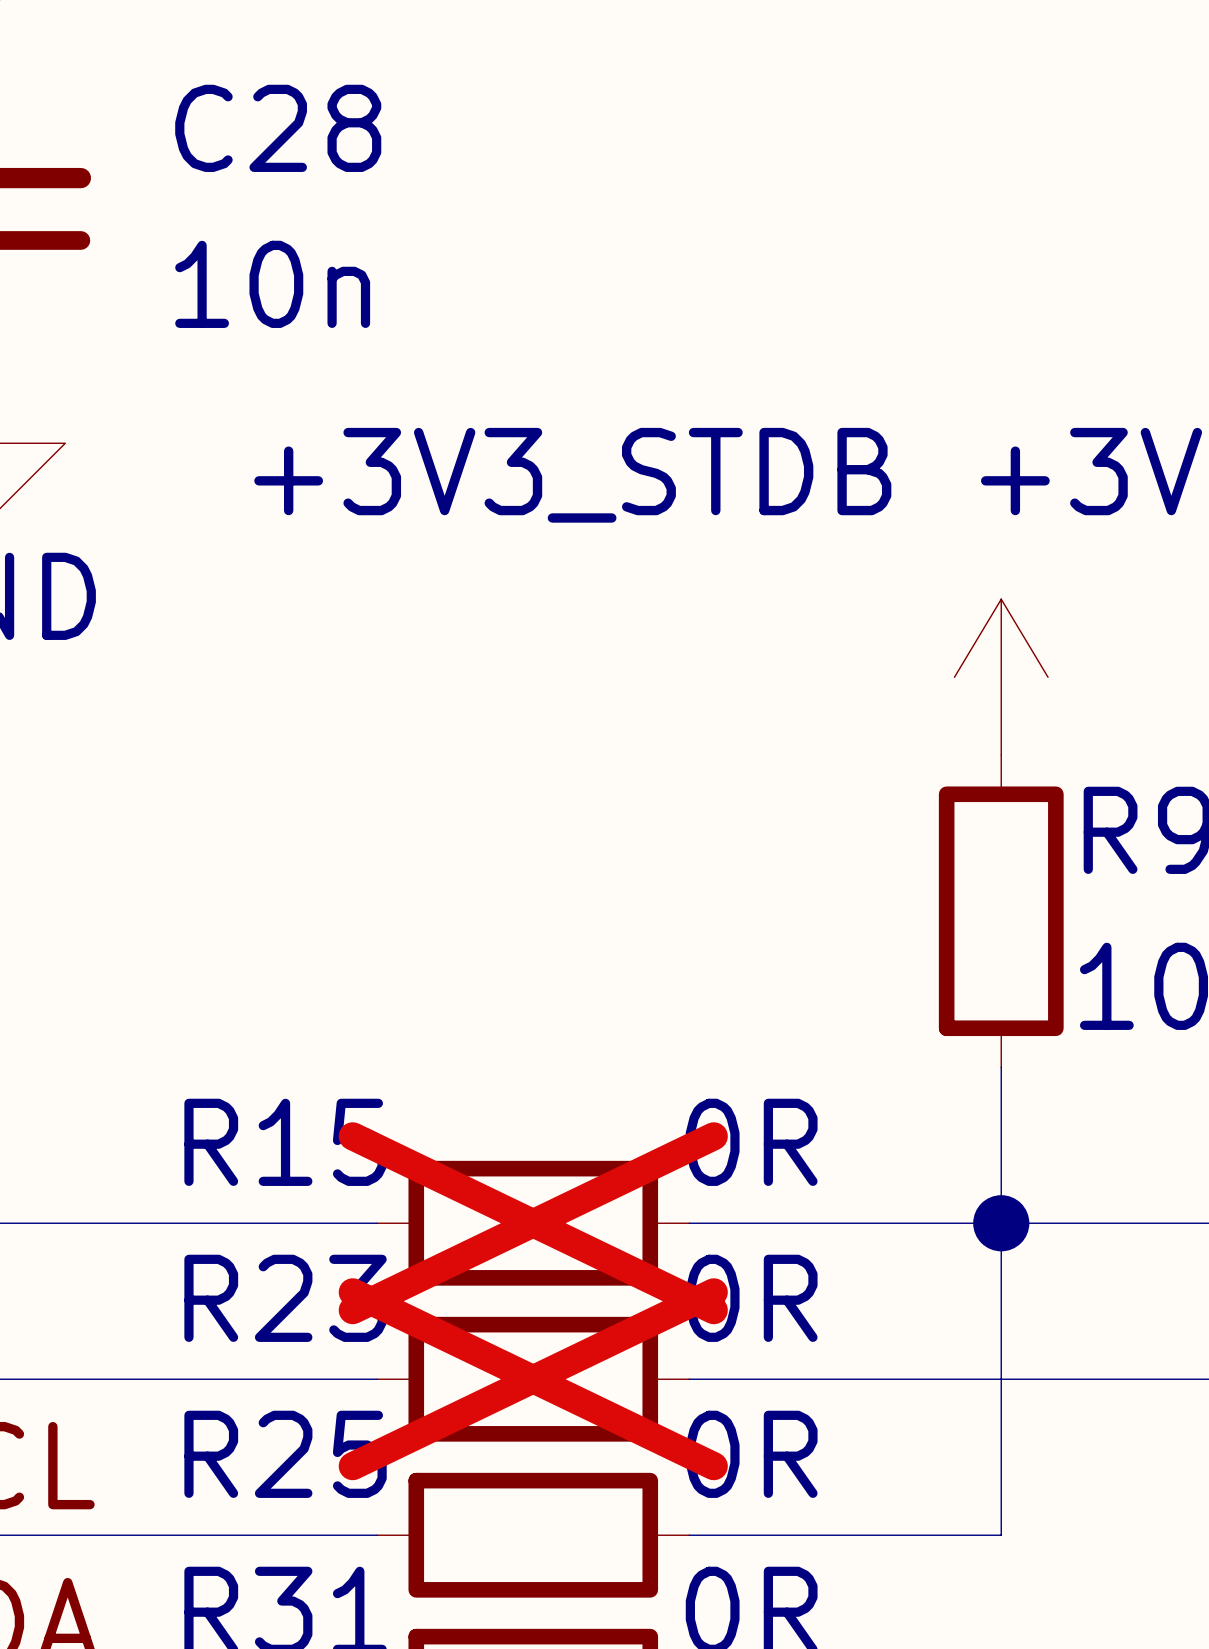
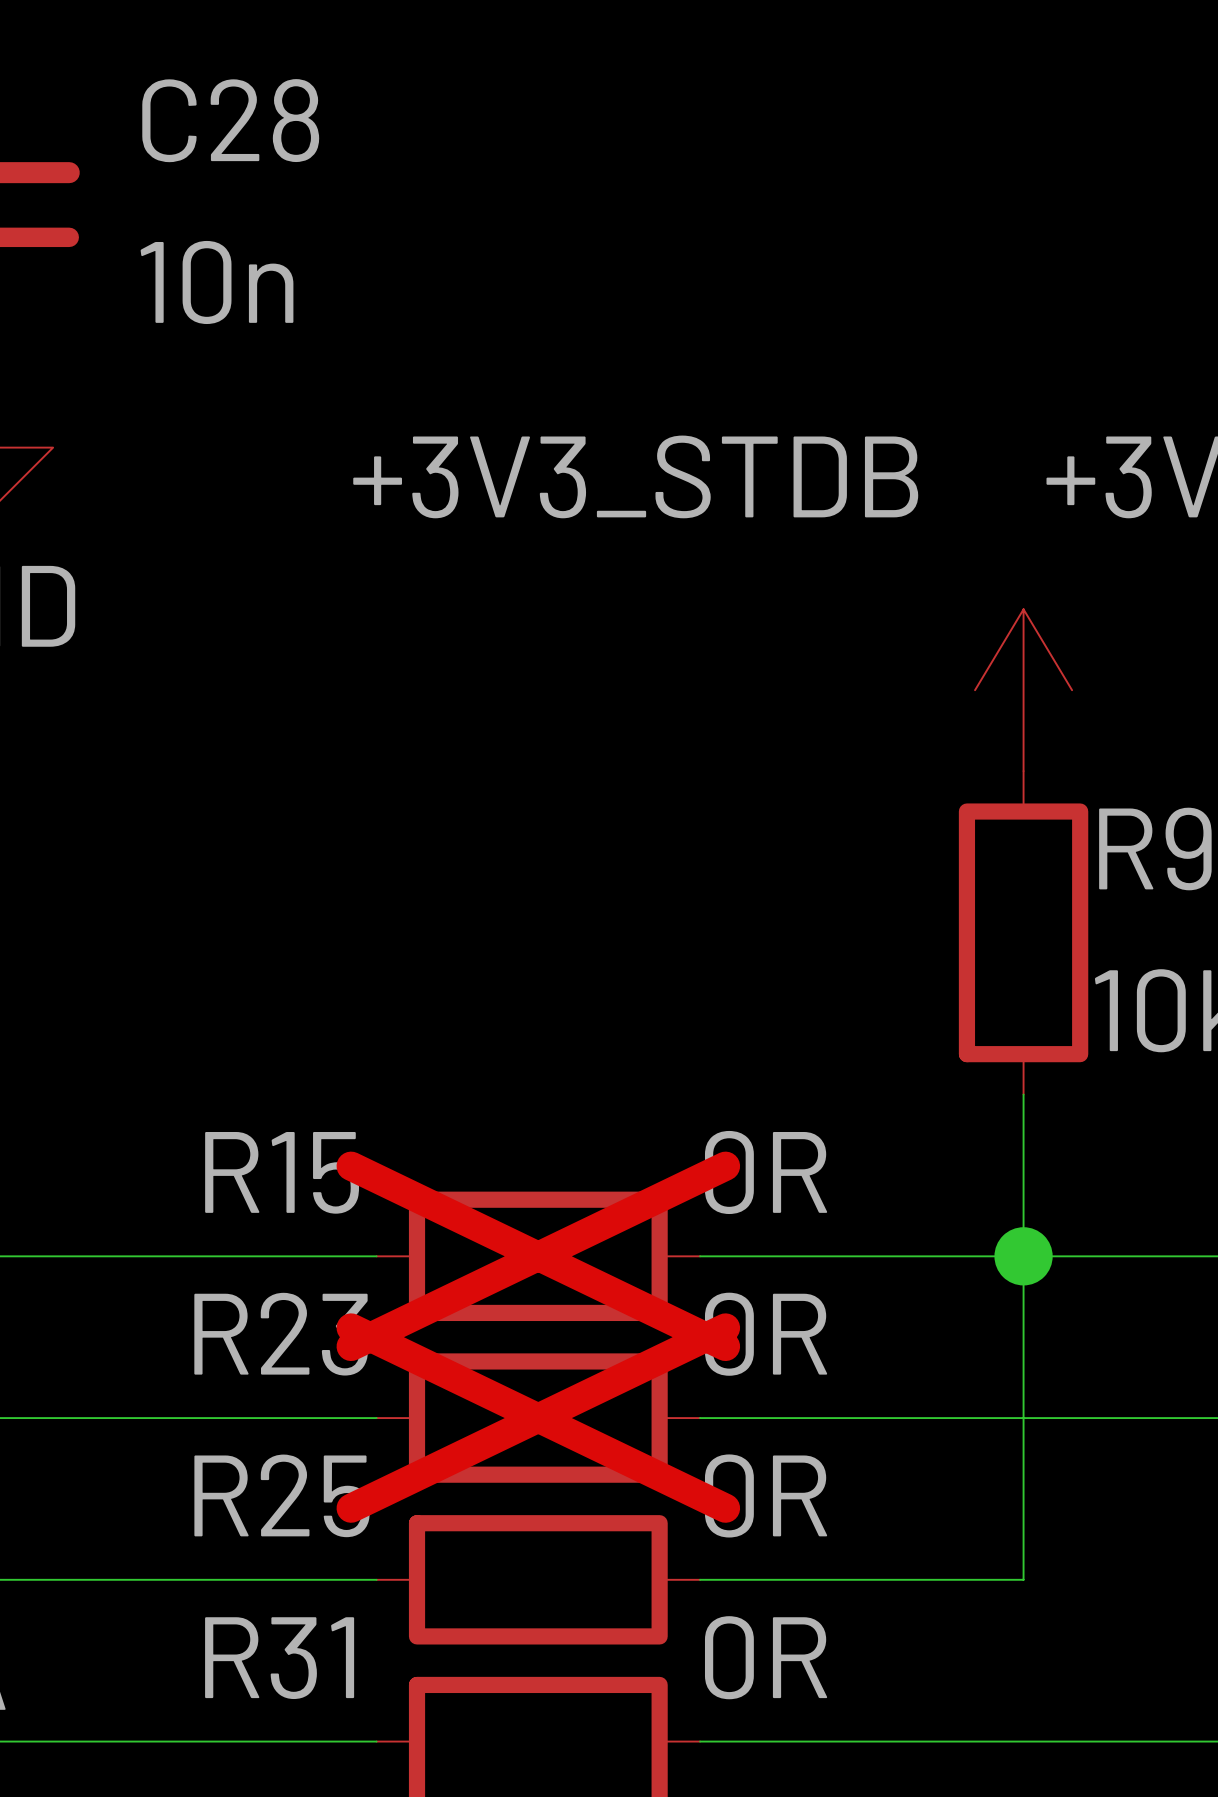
C28 name position: C28 (278, 128) -> C28 (230, 120)
C28 text position: 10n (272, 284) -> 10n (217, 282)

